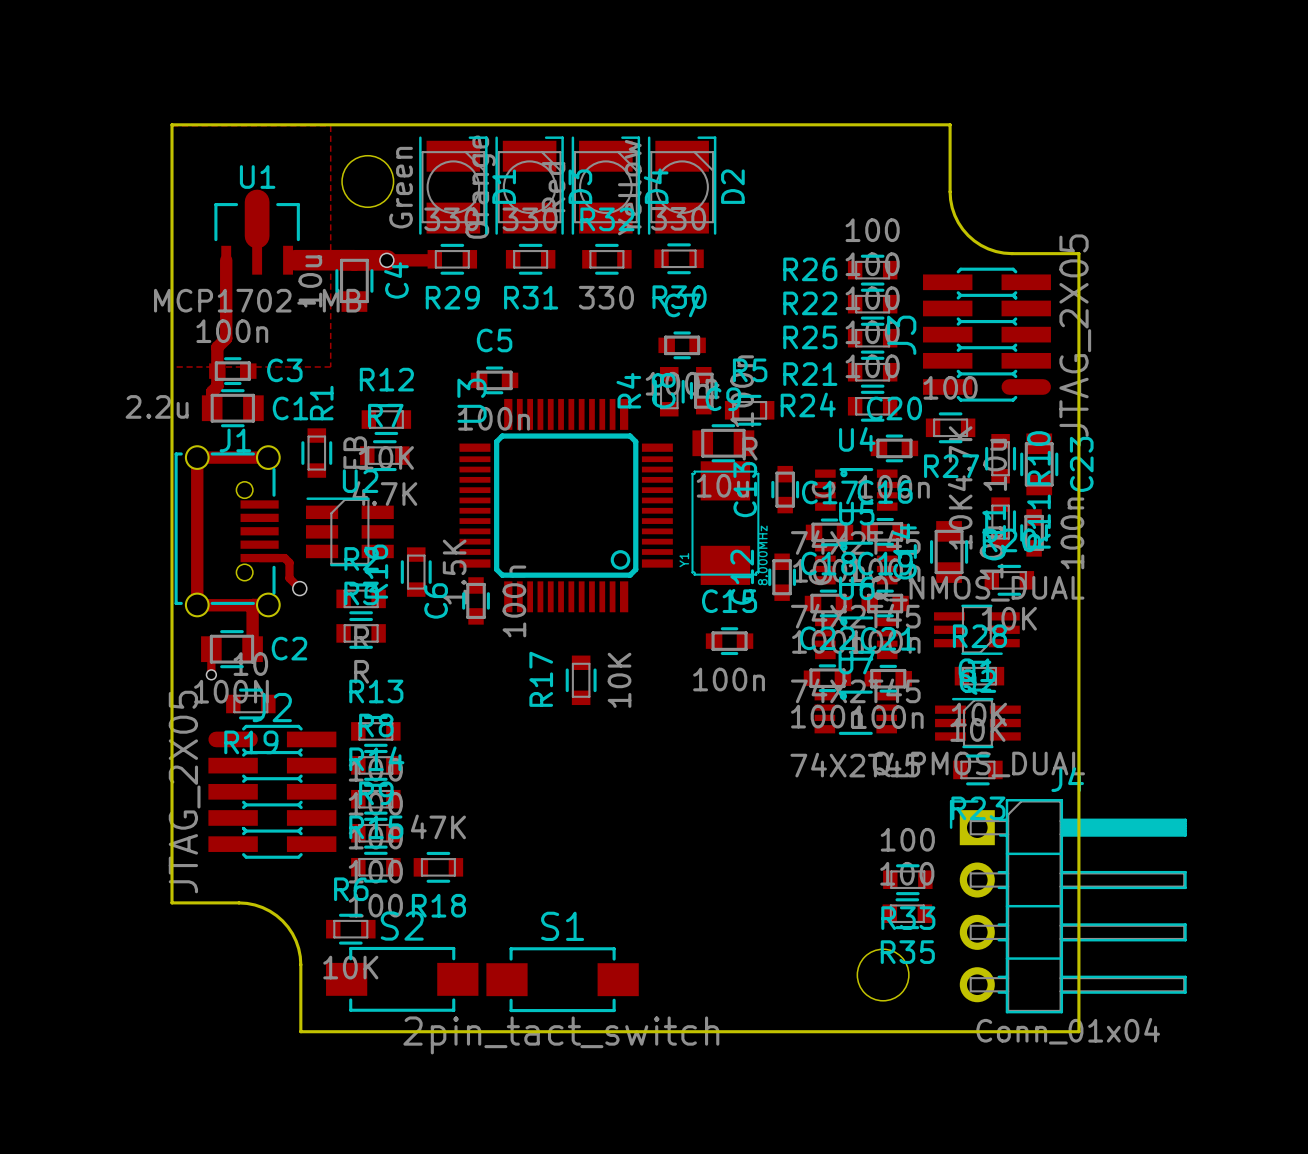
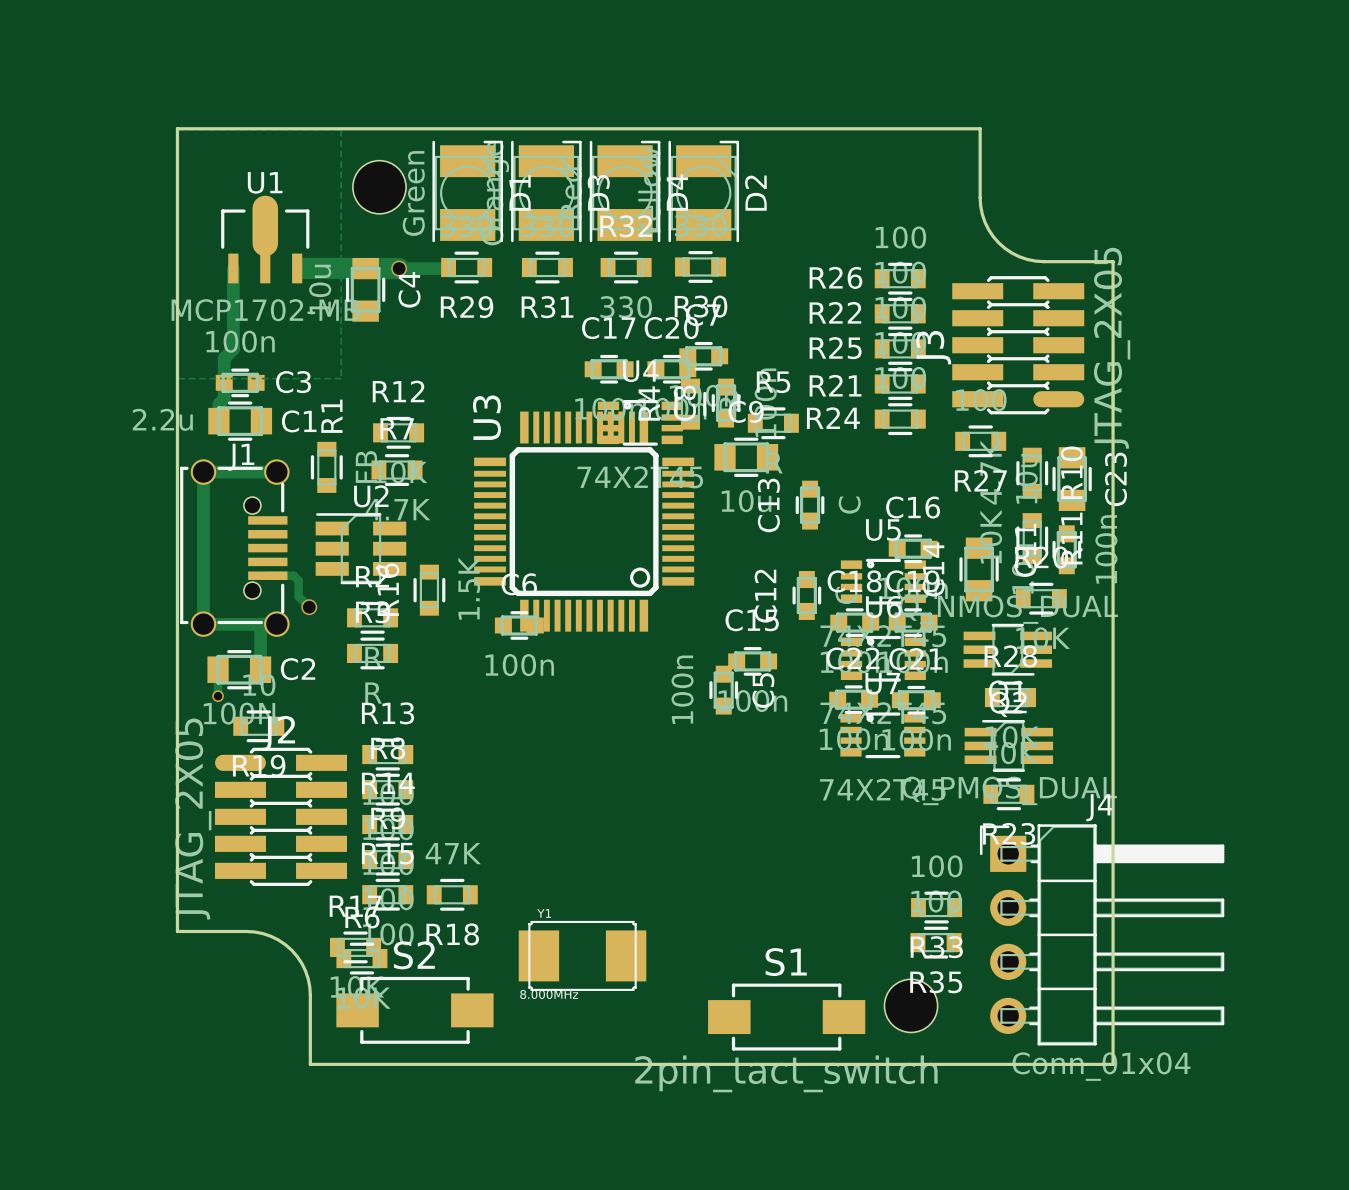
C5 rotation: 0° (494, 380) -> 90° clockwise (723, 690)
C5 position: (494, 380) -> (723, 690)
C20 position: (894, 448) -> (671, 369)
U4 position: (856, 490) -> (640, 422)
Y1 rotation: 0° (725, 523) -> 90° clockwise (582, 955)
Y1 position: (725, 523) -> (582, 955)
C17 position: (829, 532) -> (609, 369)
C6 rotation: 0° (476, 600) -> 90° clockwise (519, 625)
R17 rotation: 0° (581, 680) -> 90° clockwise (355, 947)
R17 position: (581, 680) -> (355, 947)
S1 position: (562, 979) -> (786, 1017)

